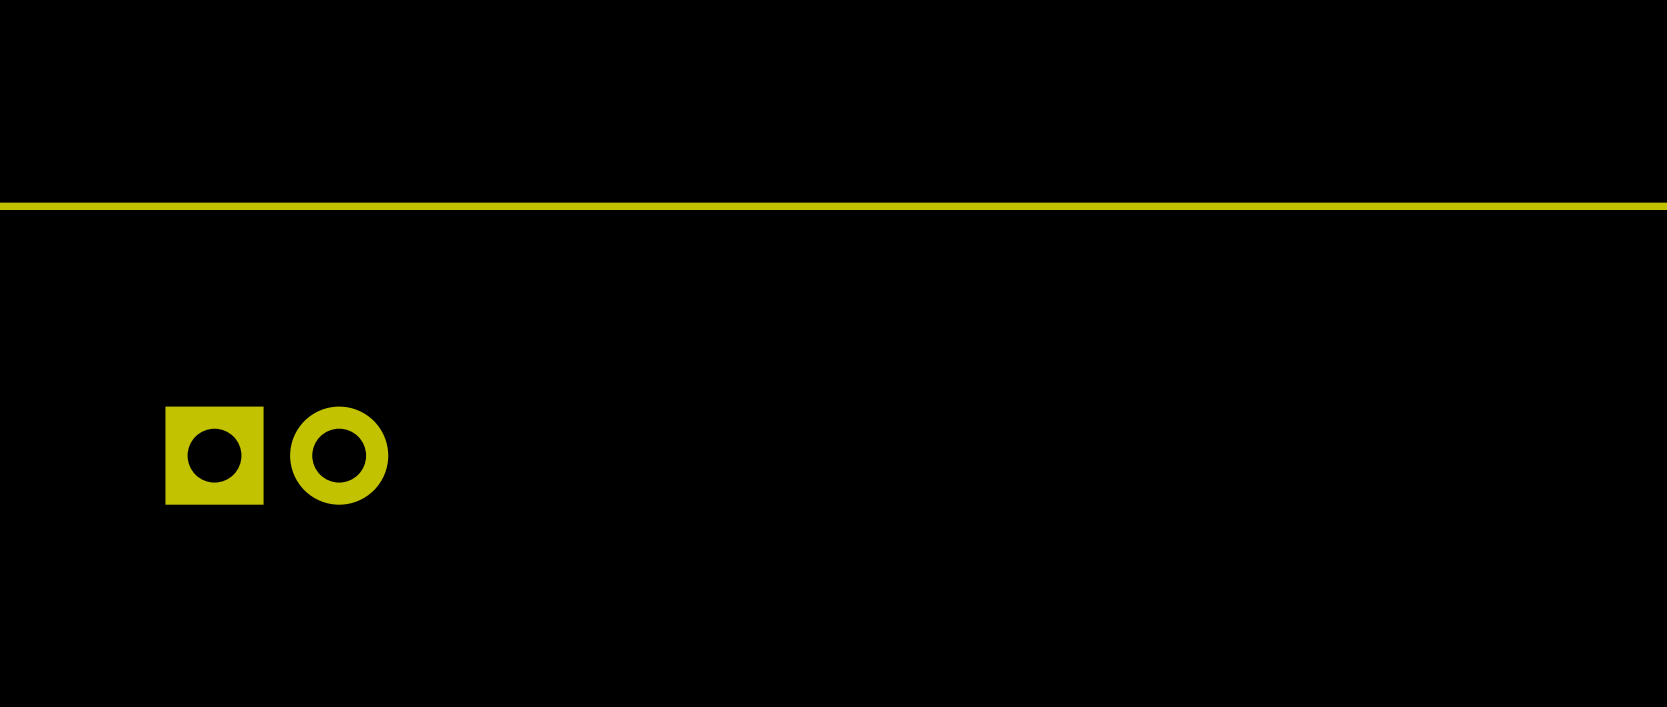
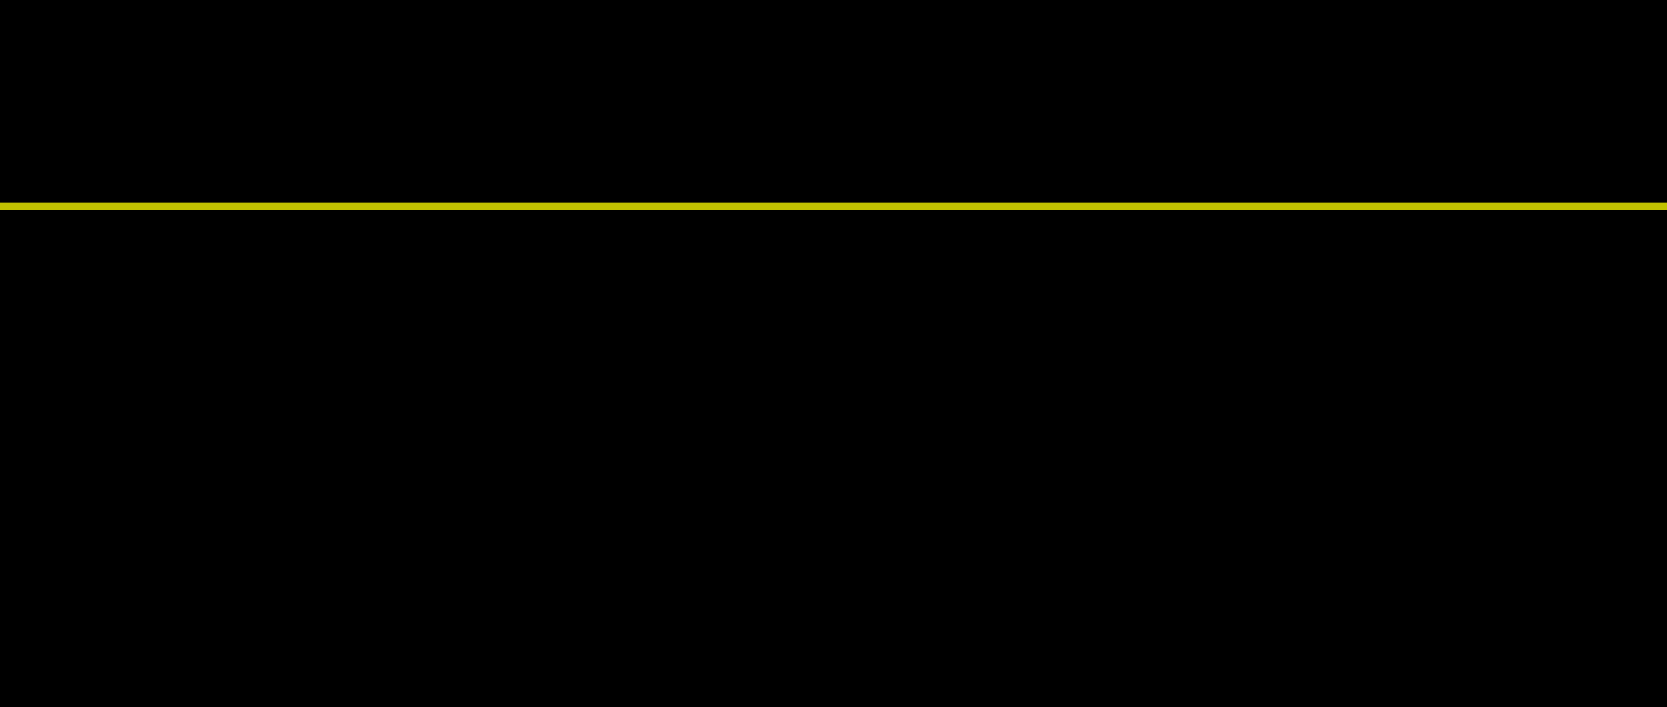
part: (276, 455) -> none

